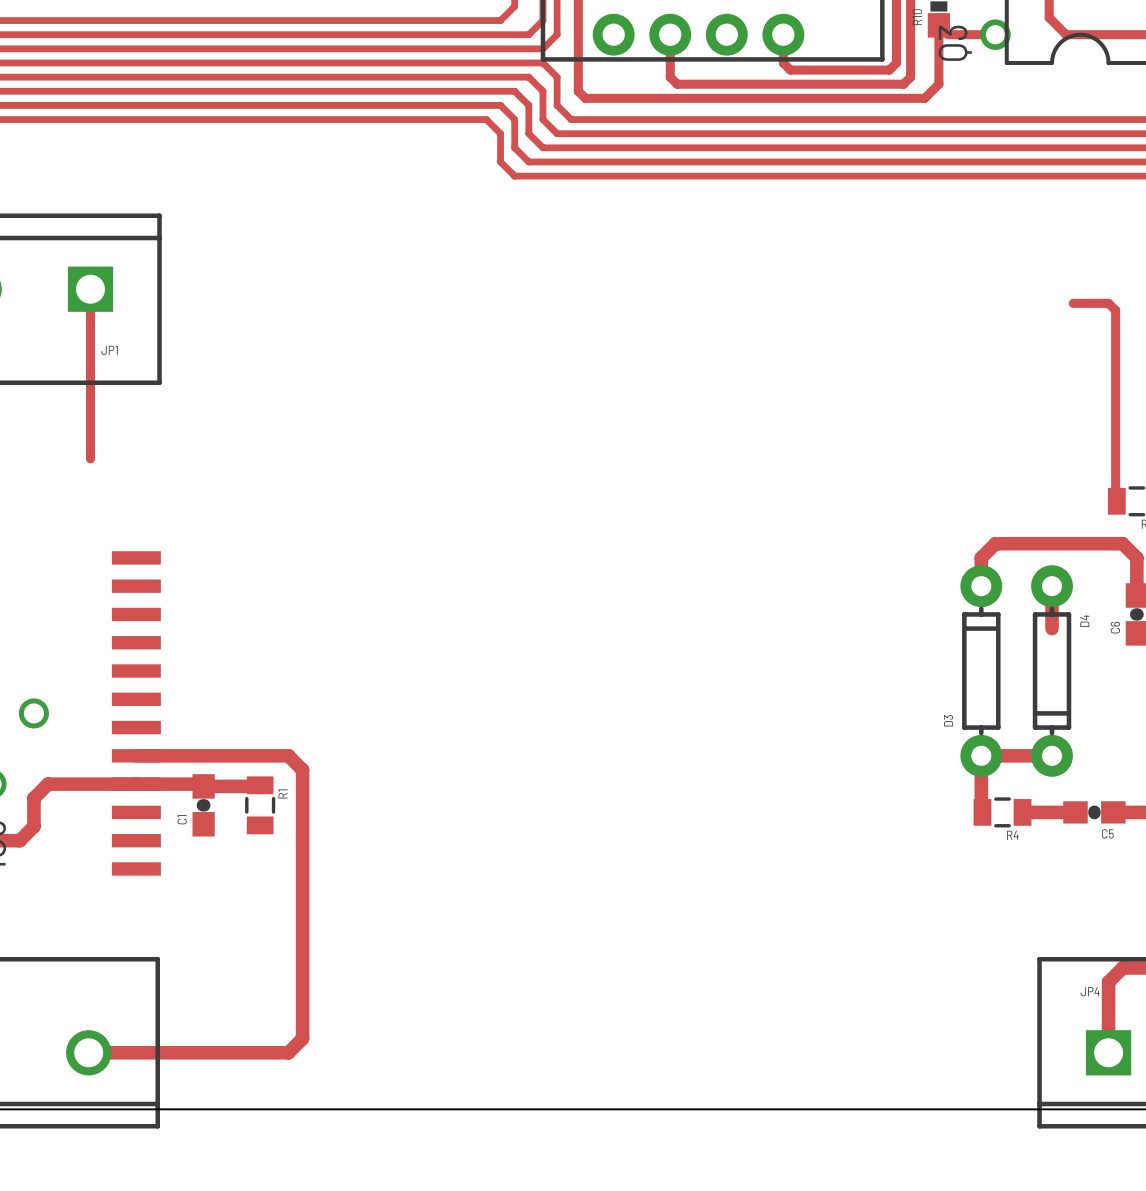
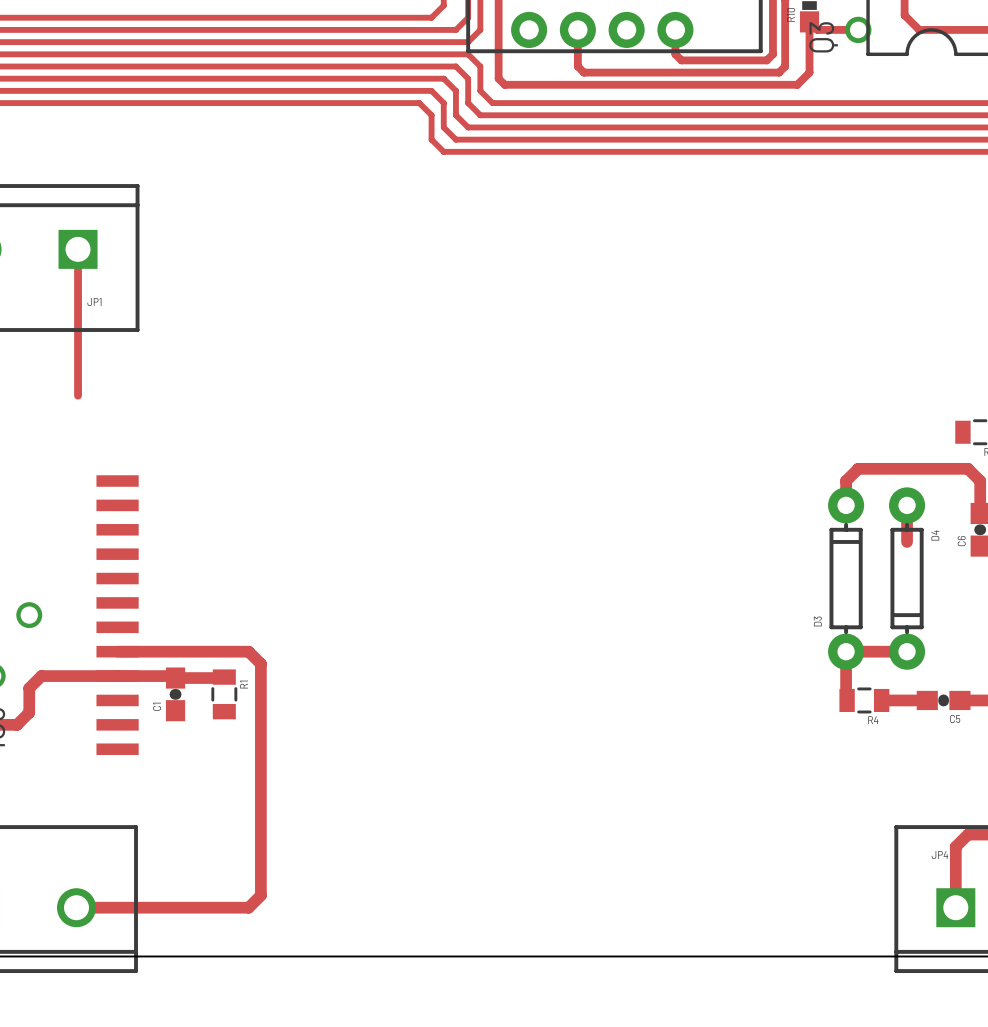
track: (1073, 303) (1108, 303) (1115, 310) (1116, 501) -> none

